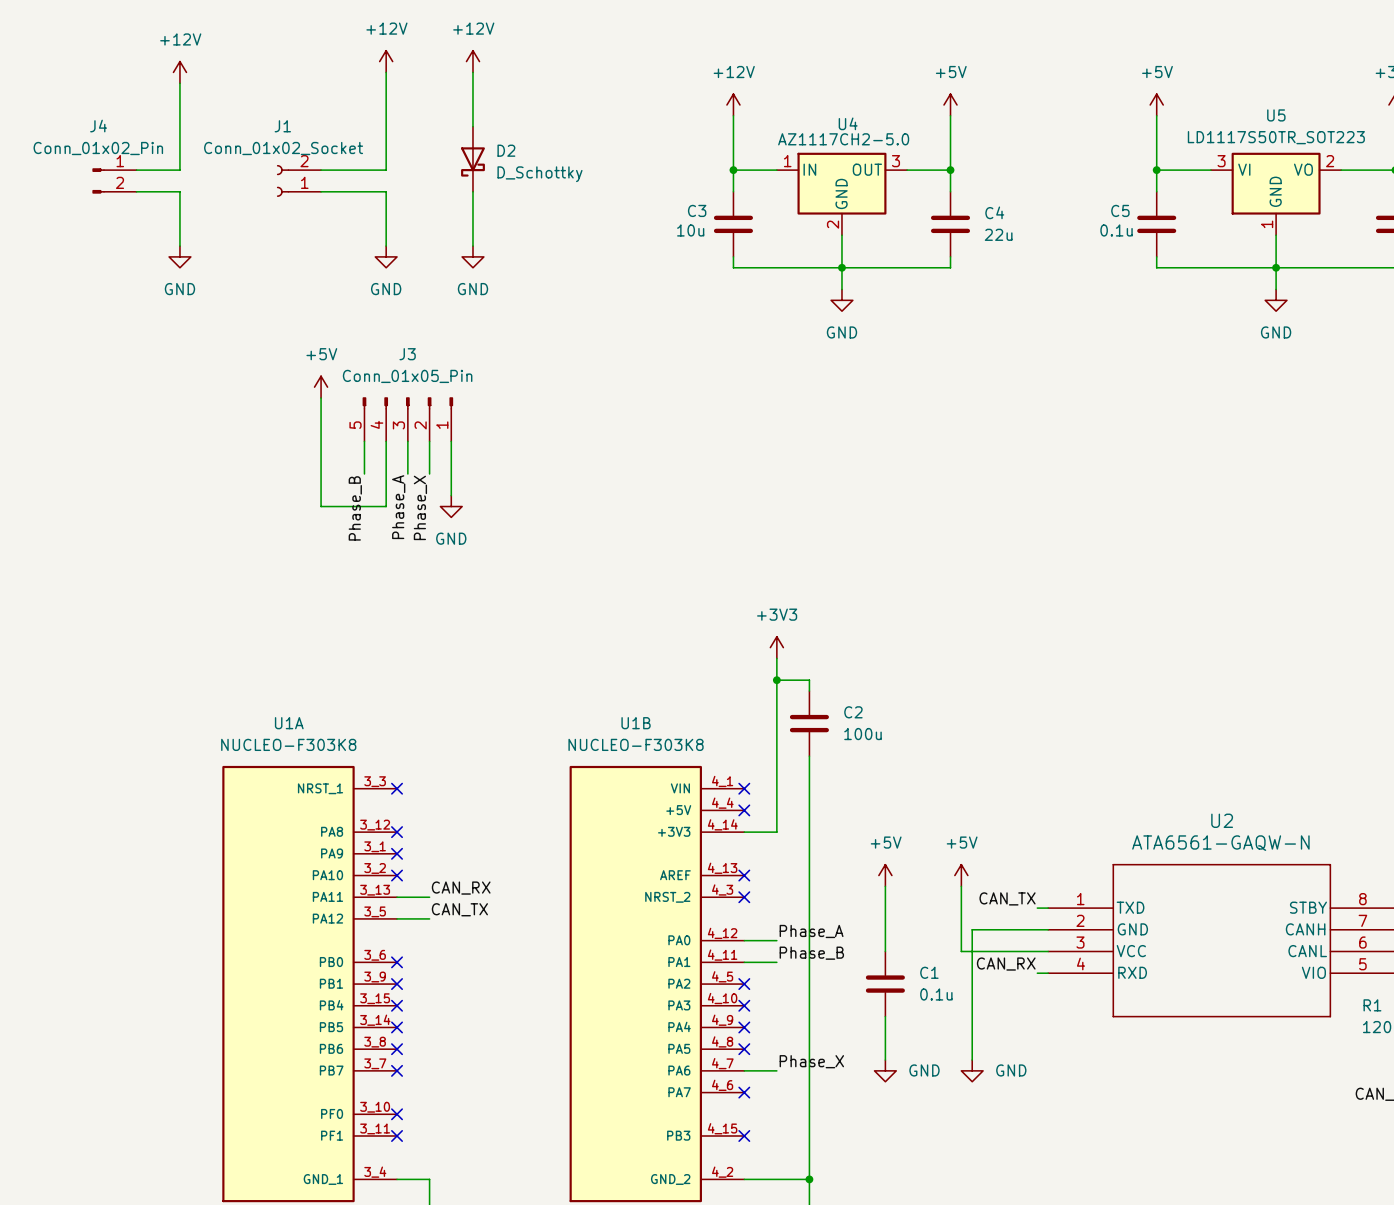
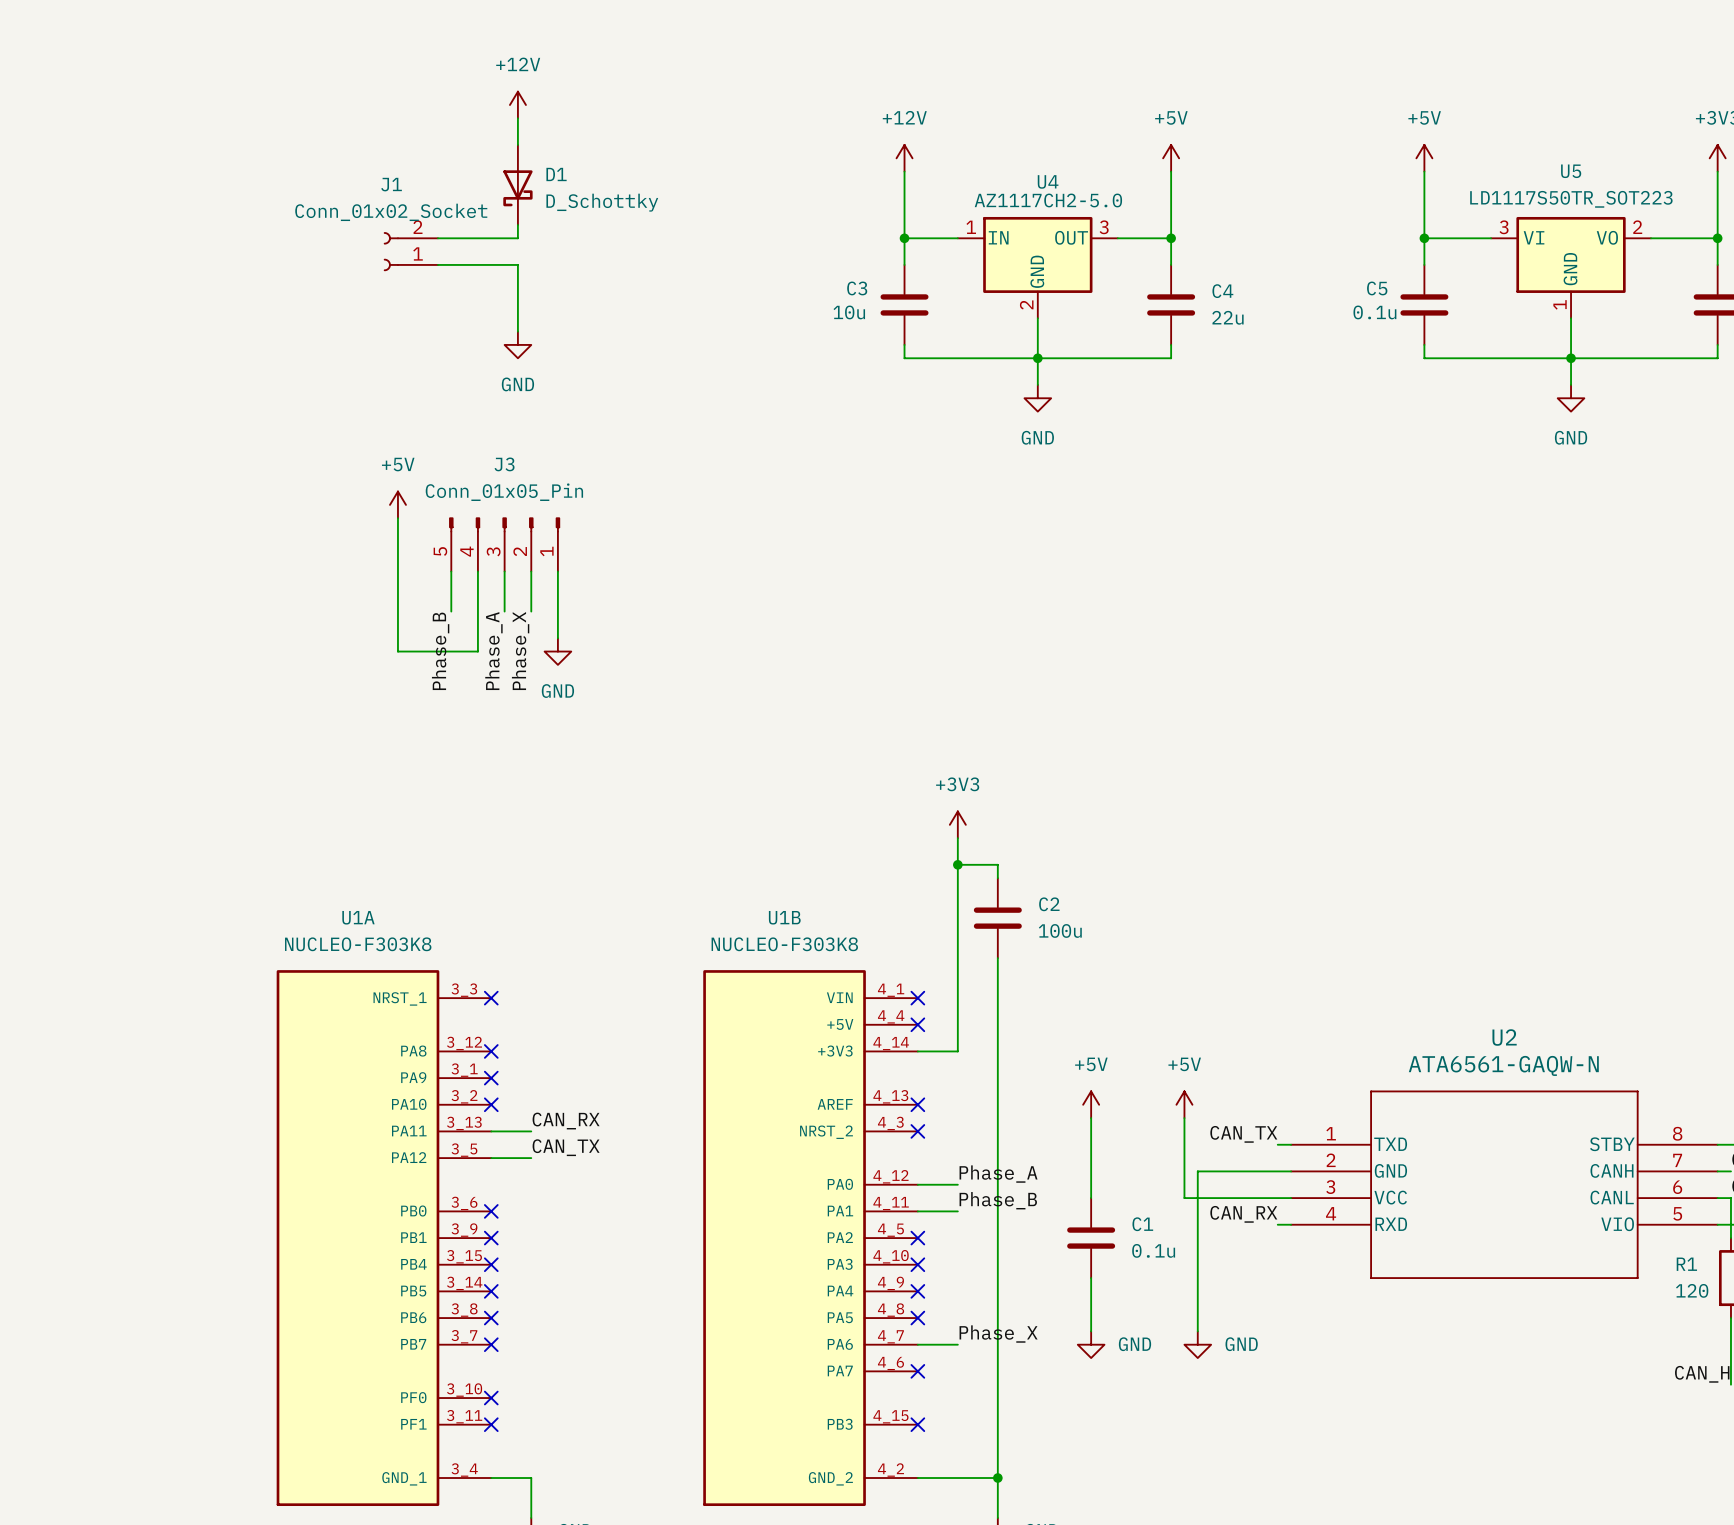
power symbol: +12V (386, 61) -> none
power symbol: none -> +12V (517, 105)
power symbol: +12V (472, 61) -> none
power symbol: +12V (179, 72) -> none
wire: (386, 72) (386, 170) -> (517, 224) (517, 238) (477, 238)
wire: none -> (517, 118) (517, 144)
wire: (472, 72) (472, 126) -> none
wire: (179, 83) (179, 170) (136, 170) -> none
D1: none -> D_Schottky (517, 184)
D2: D_Schottky (472, 159) -> none
J4: Conn_01x02_Pin (114, 180) -> none
J1 position: (299, 180) -> (410, 251)
wire: (136, 191) (179, 191) (179, 246) -> none
wire: (386, 191) (386, 246) -> (477, 264) (517, 264) (517, 331)
wire: (472, 191) (472, 246) -> none
power symbol: GND (179, 256) -> none
power symbol: GND (386, 256) -> none
power symbol: none -> GND (517, 344)
power symbol: GND (472, 256) -> none

